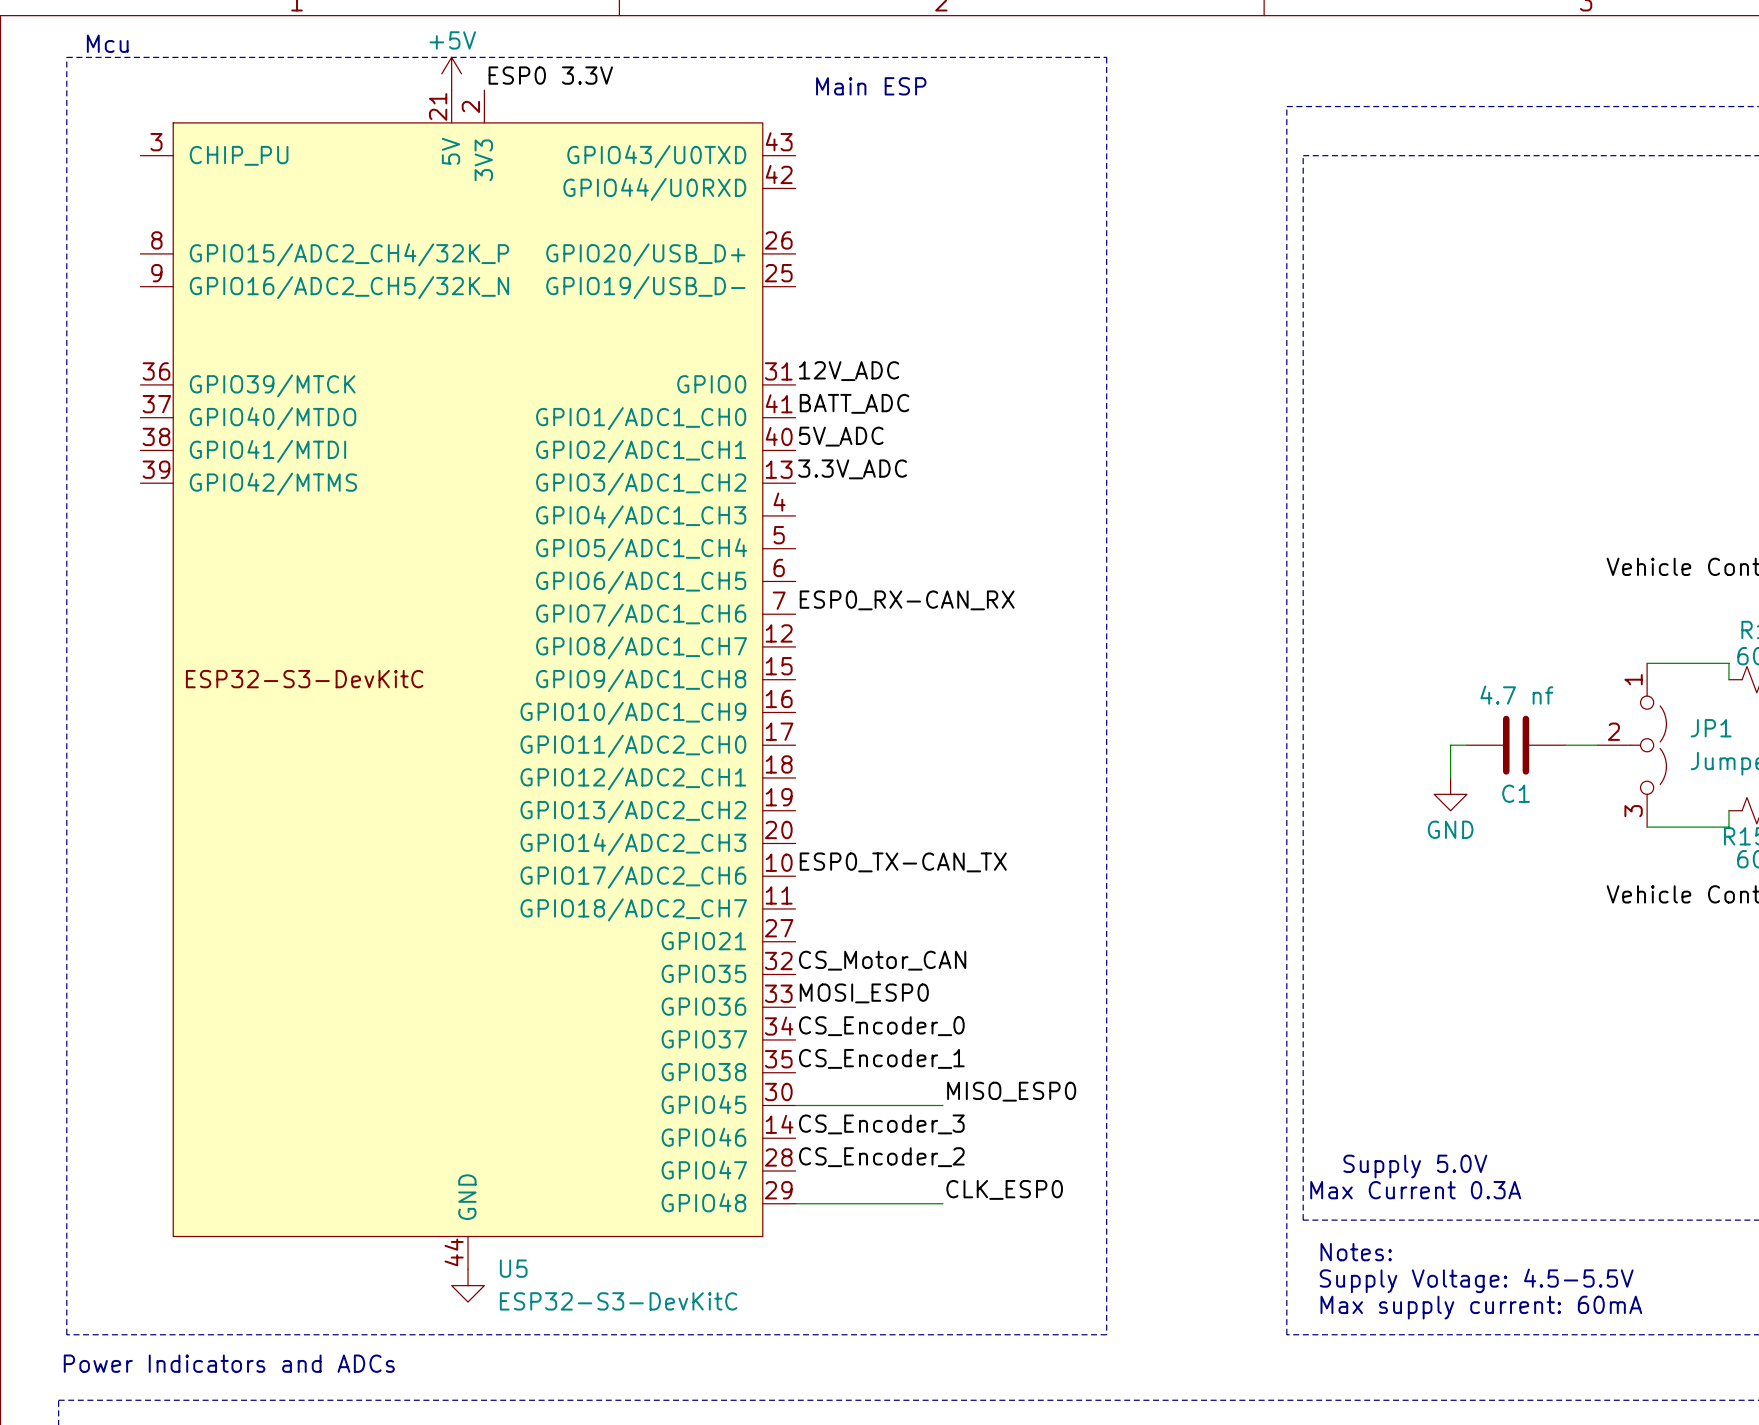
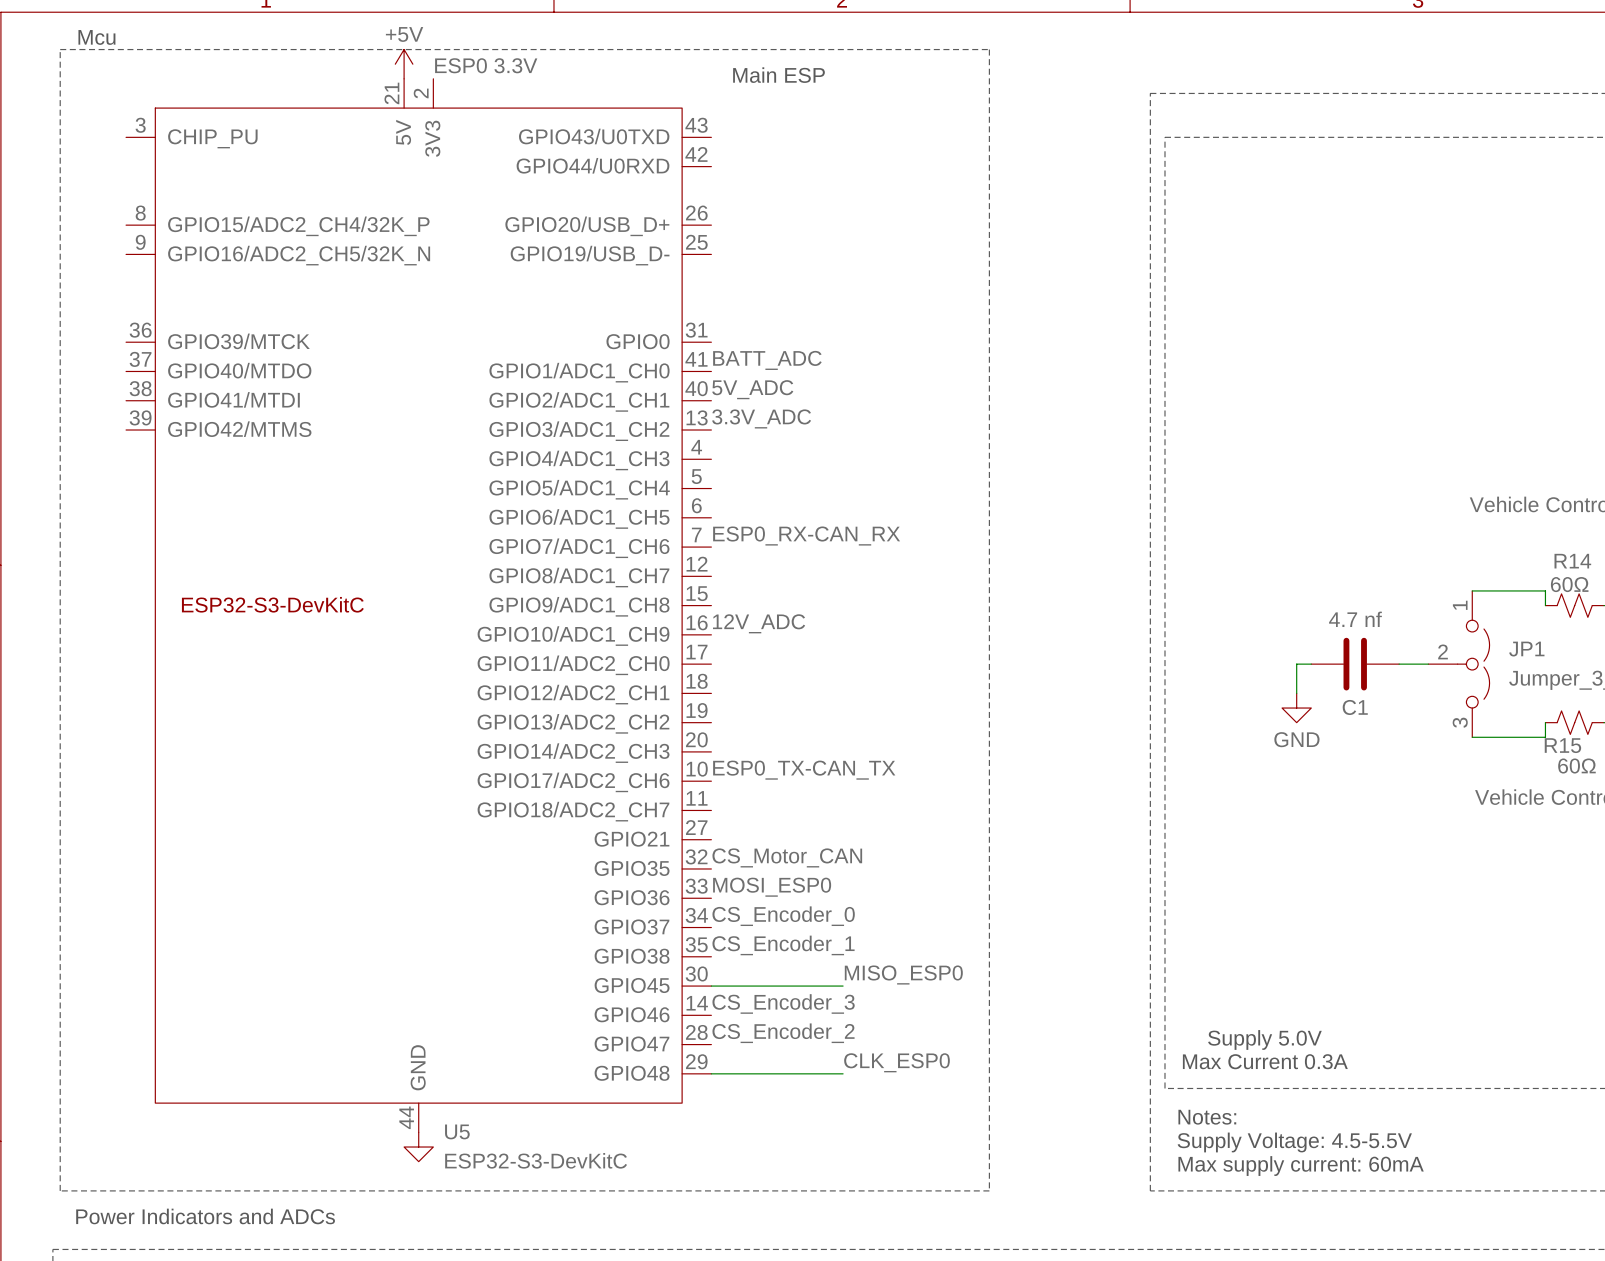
label: 12V_ADC (849, 371) -> none
label: none -> 12V_ADC (759, 623)

